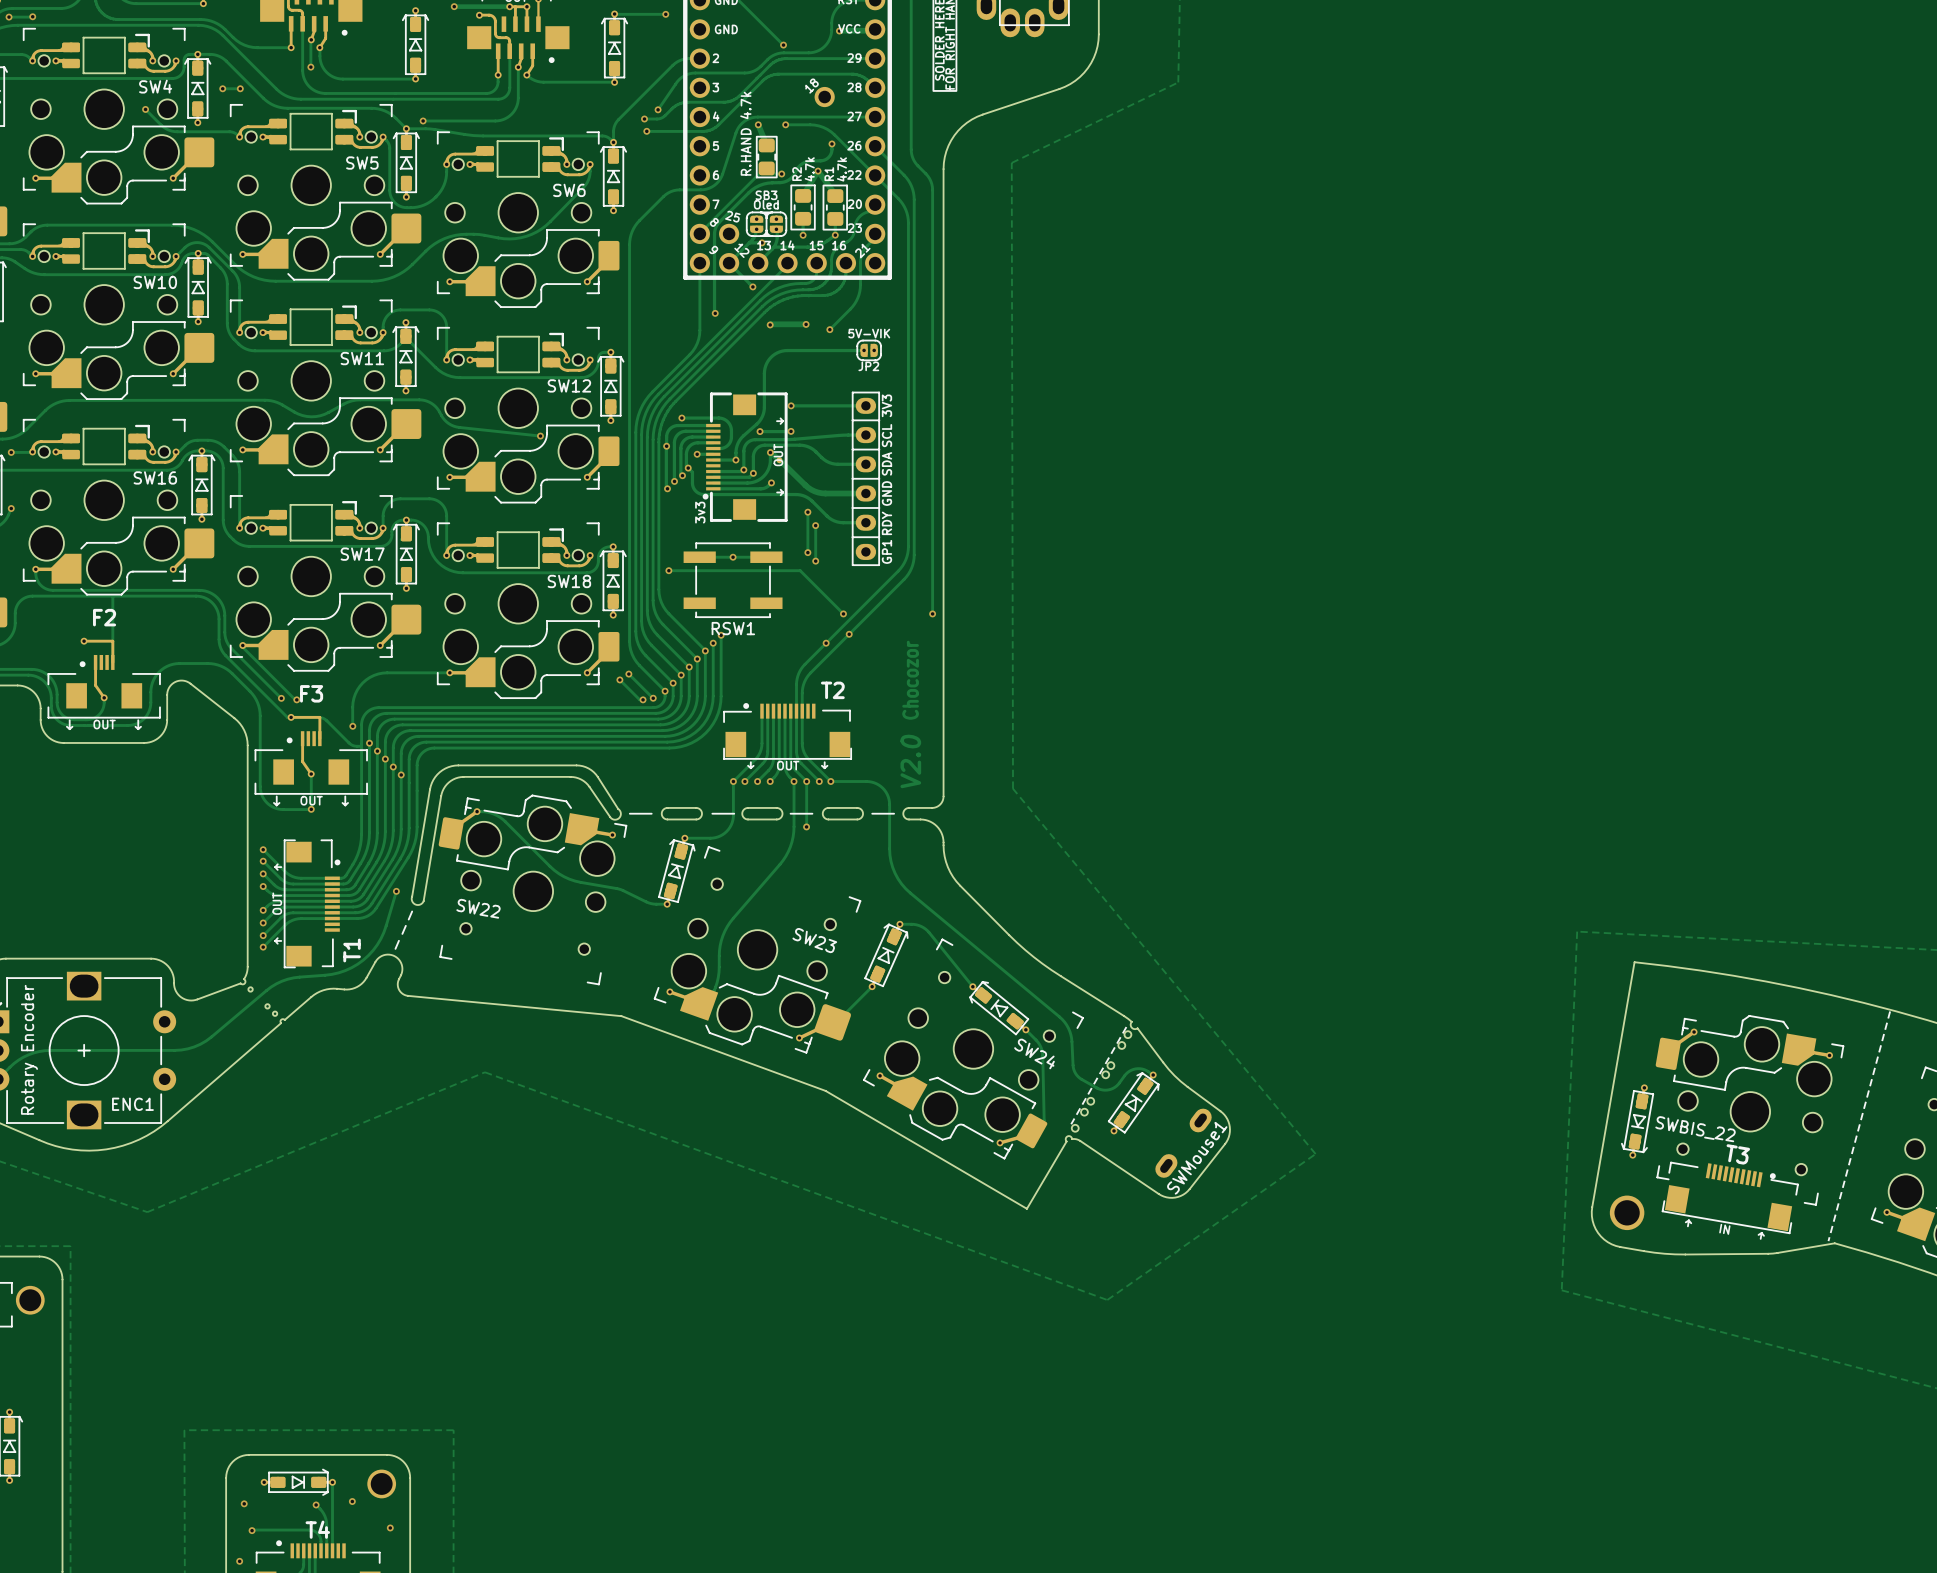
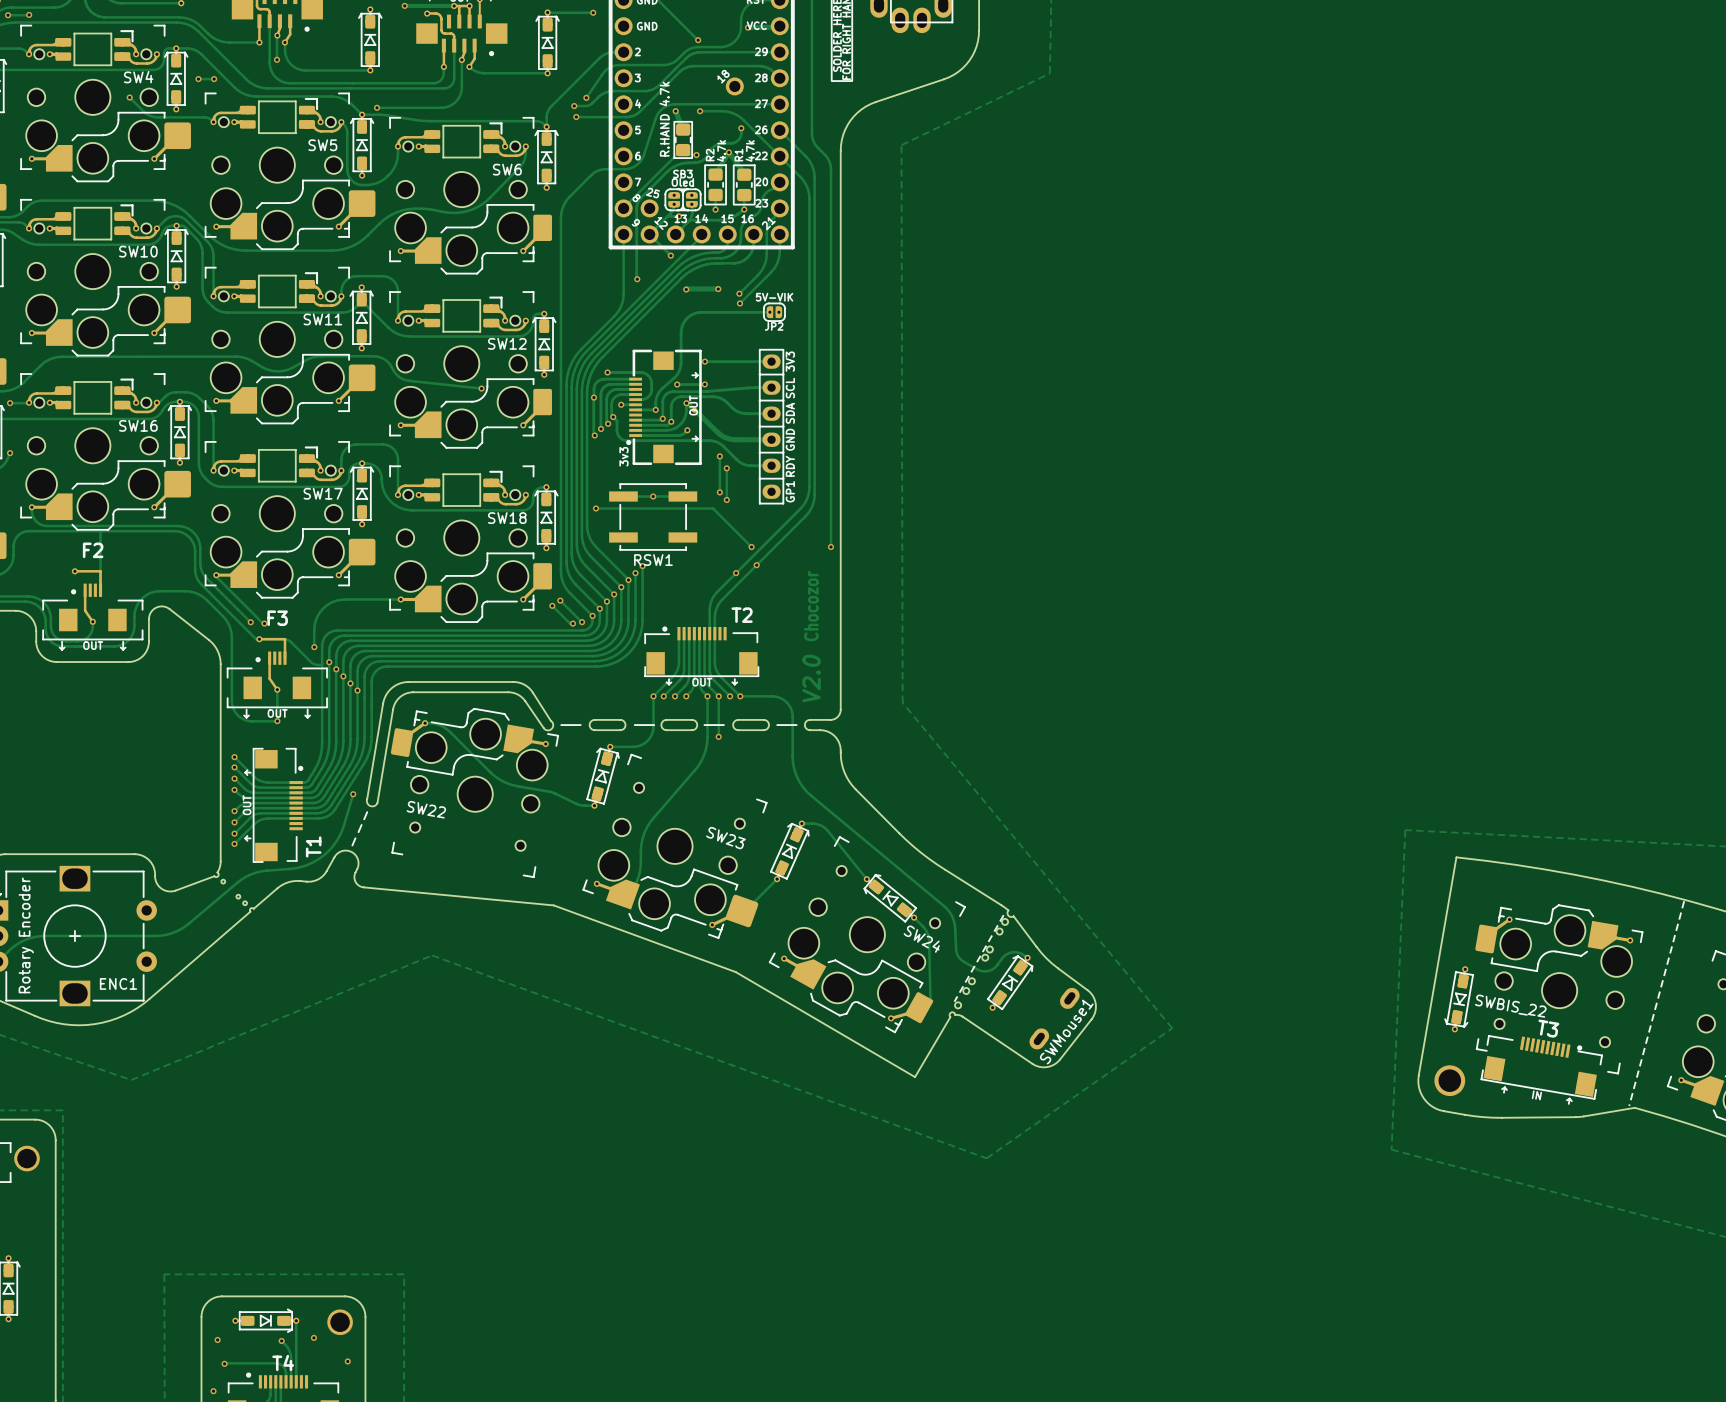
track: none -> (779, 234) (779, 253) (776, 265) (739, 303)
via: none -> (739, 303)

